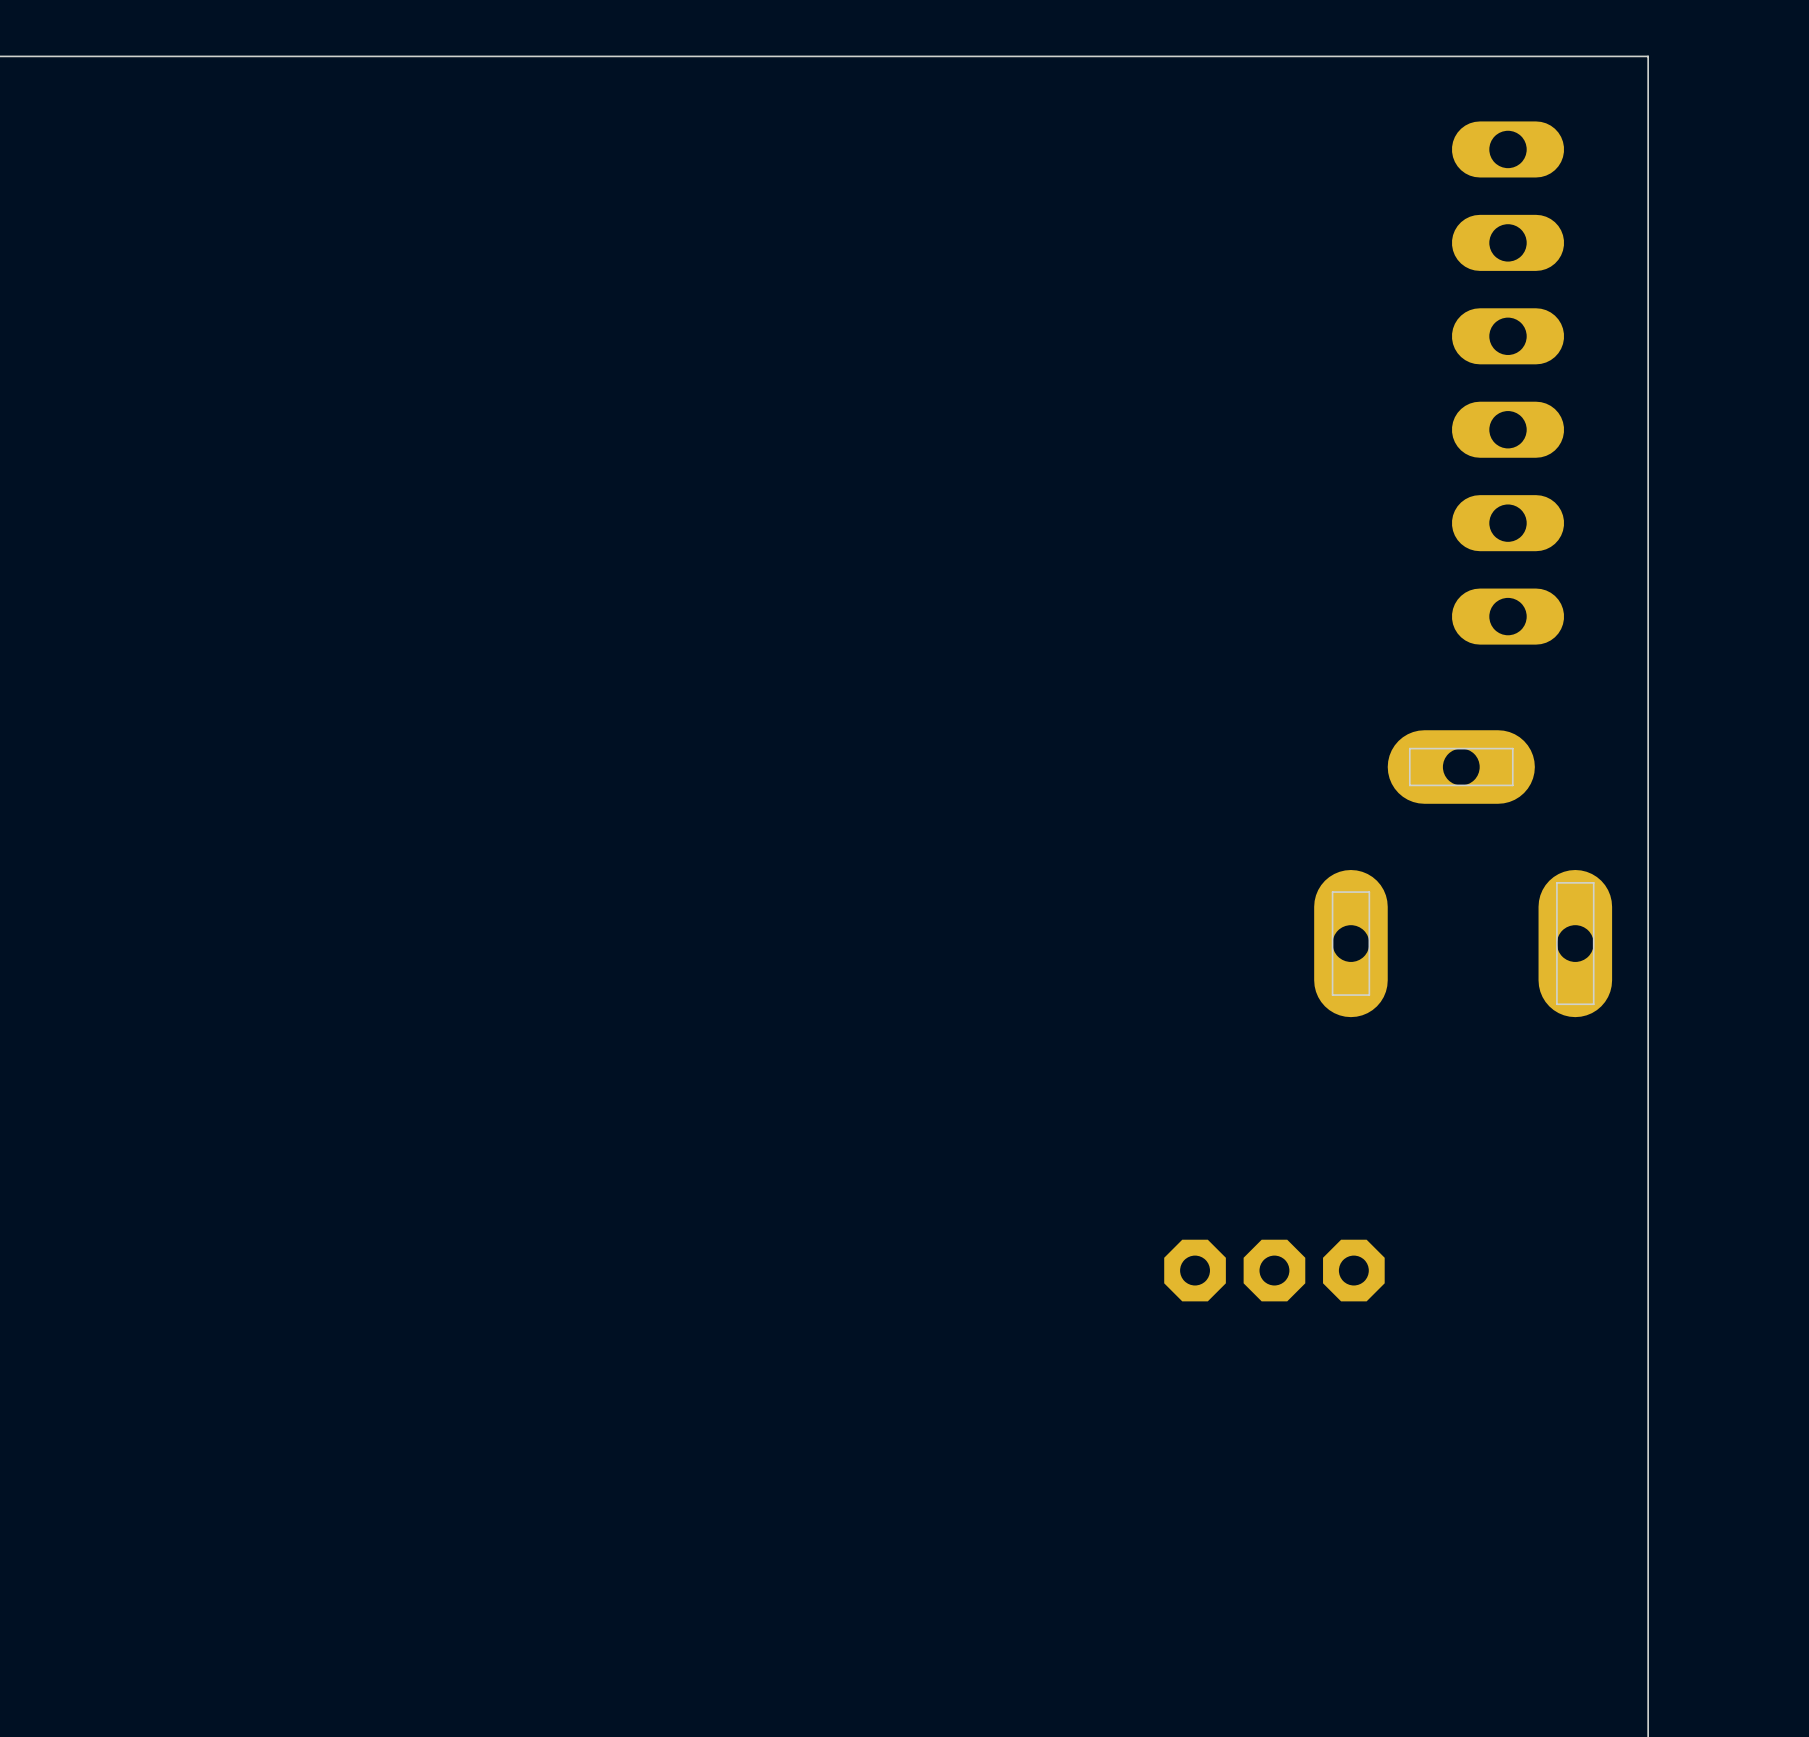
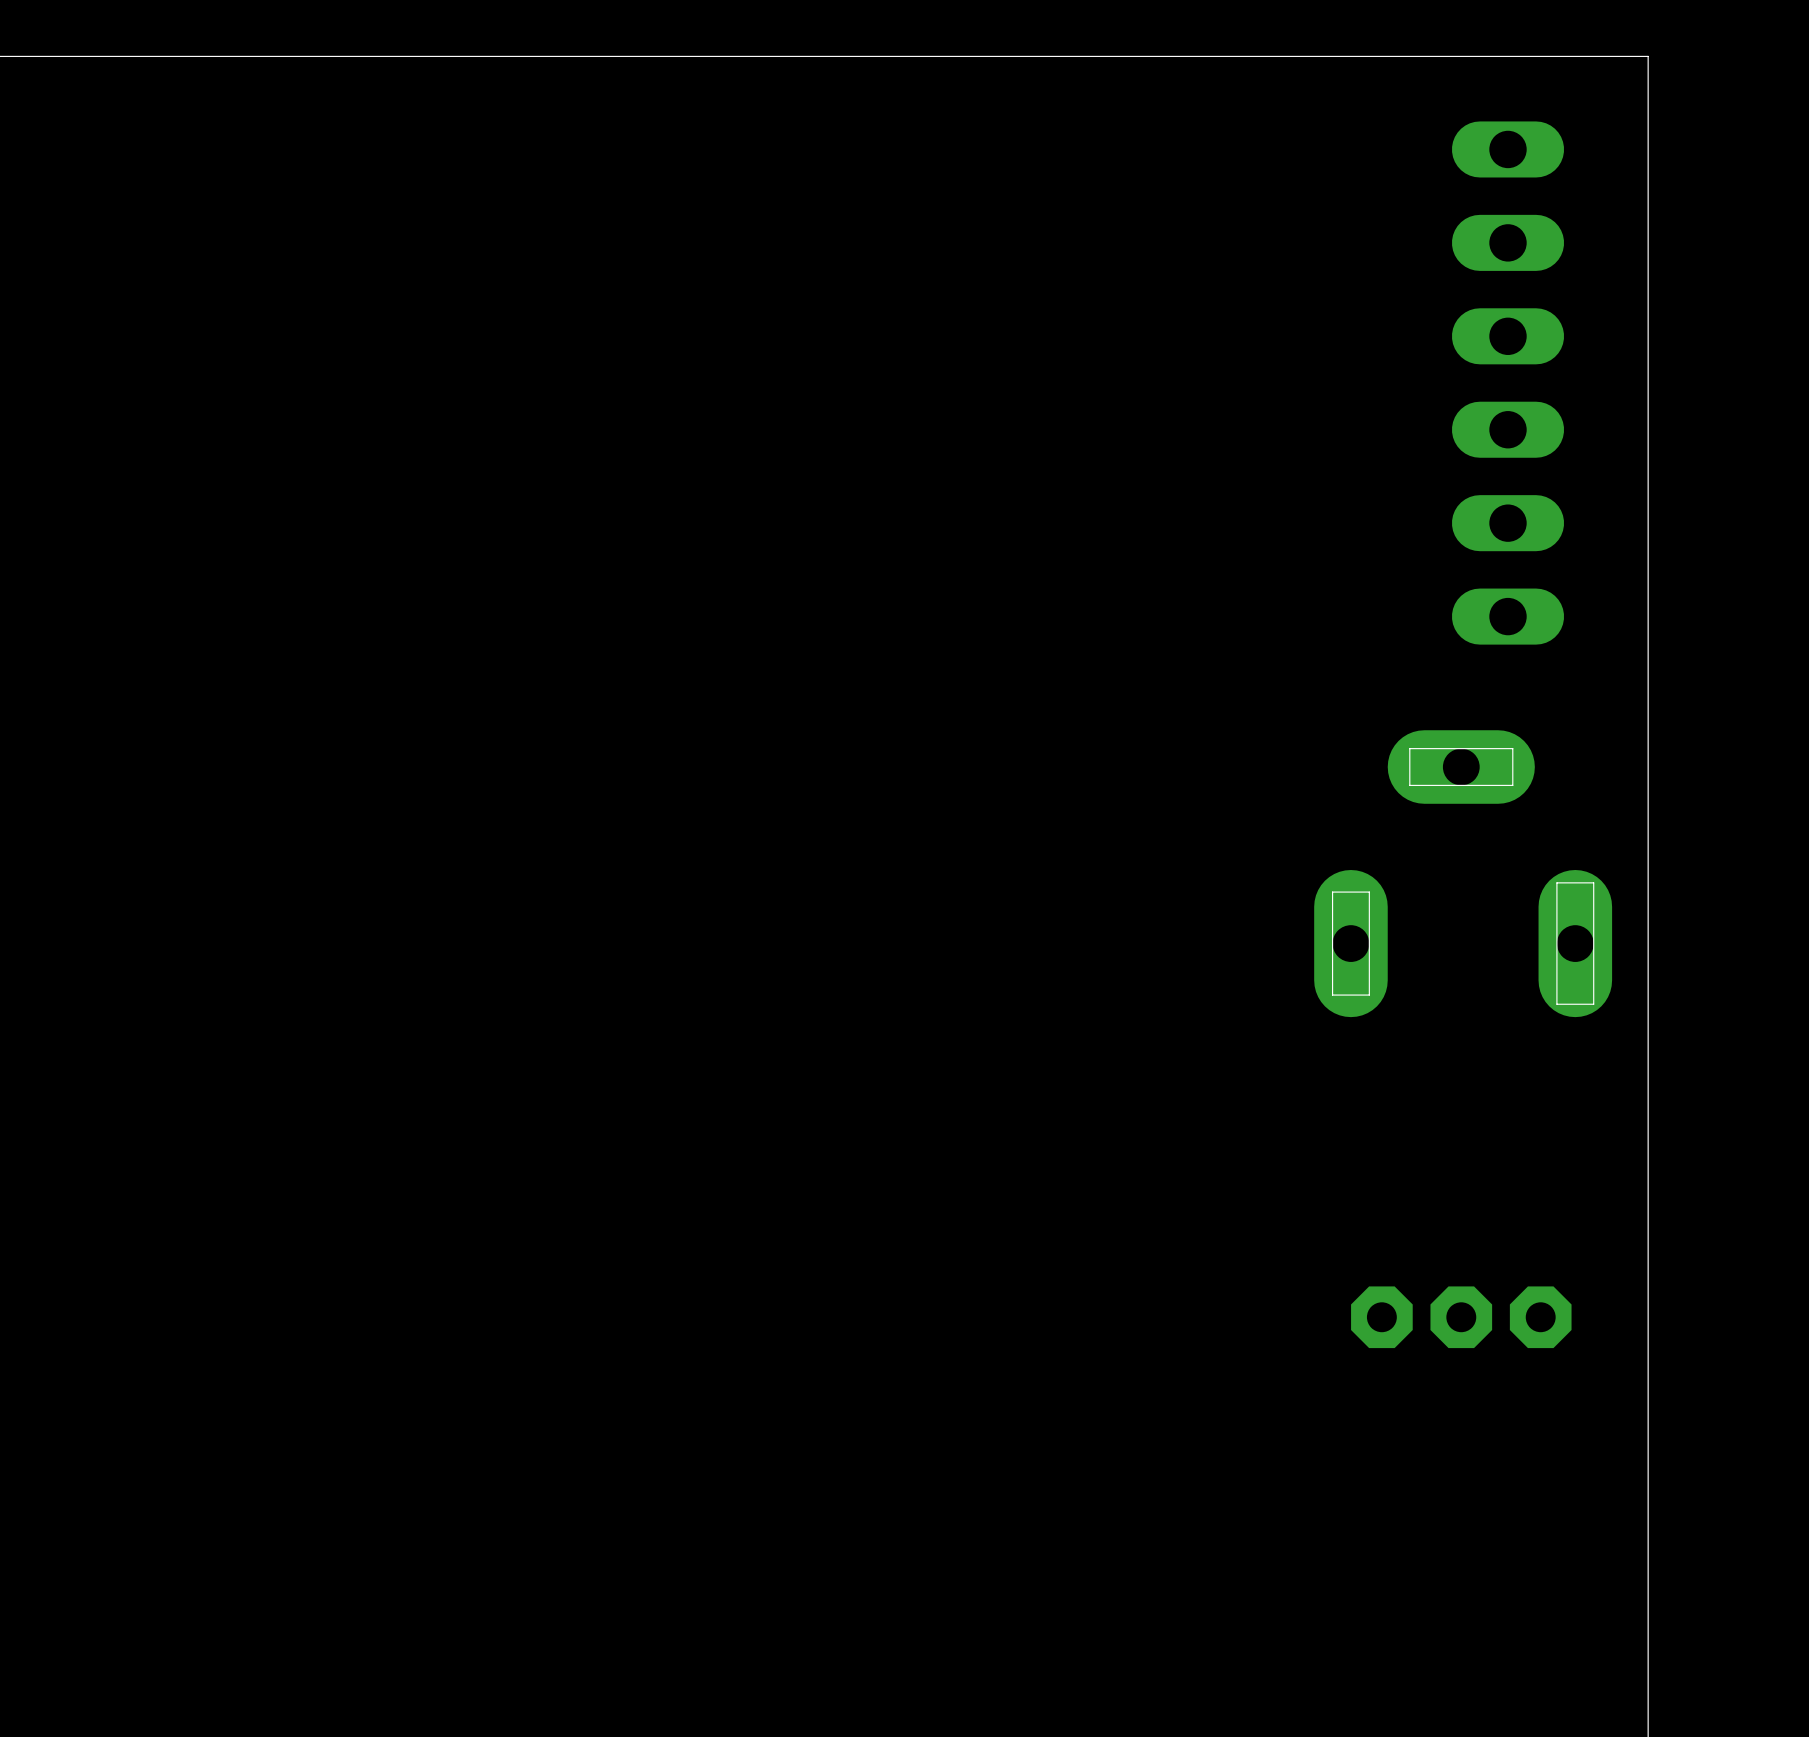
part position: (1274, 1270) -> (1461, 1317)

